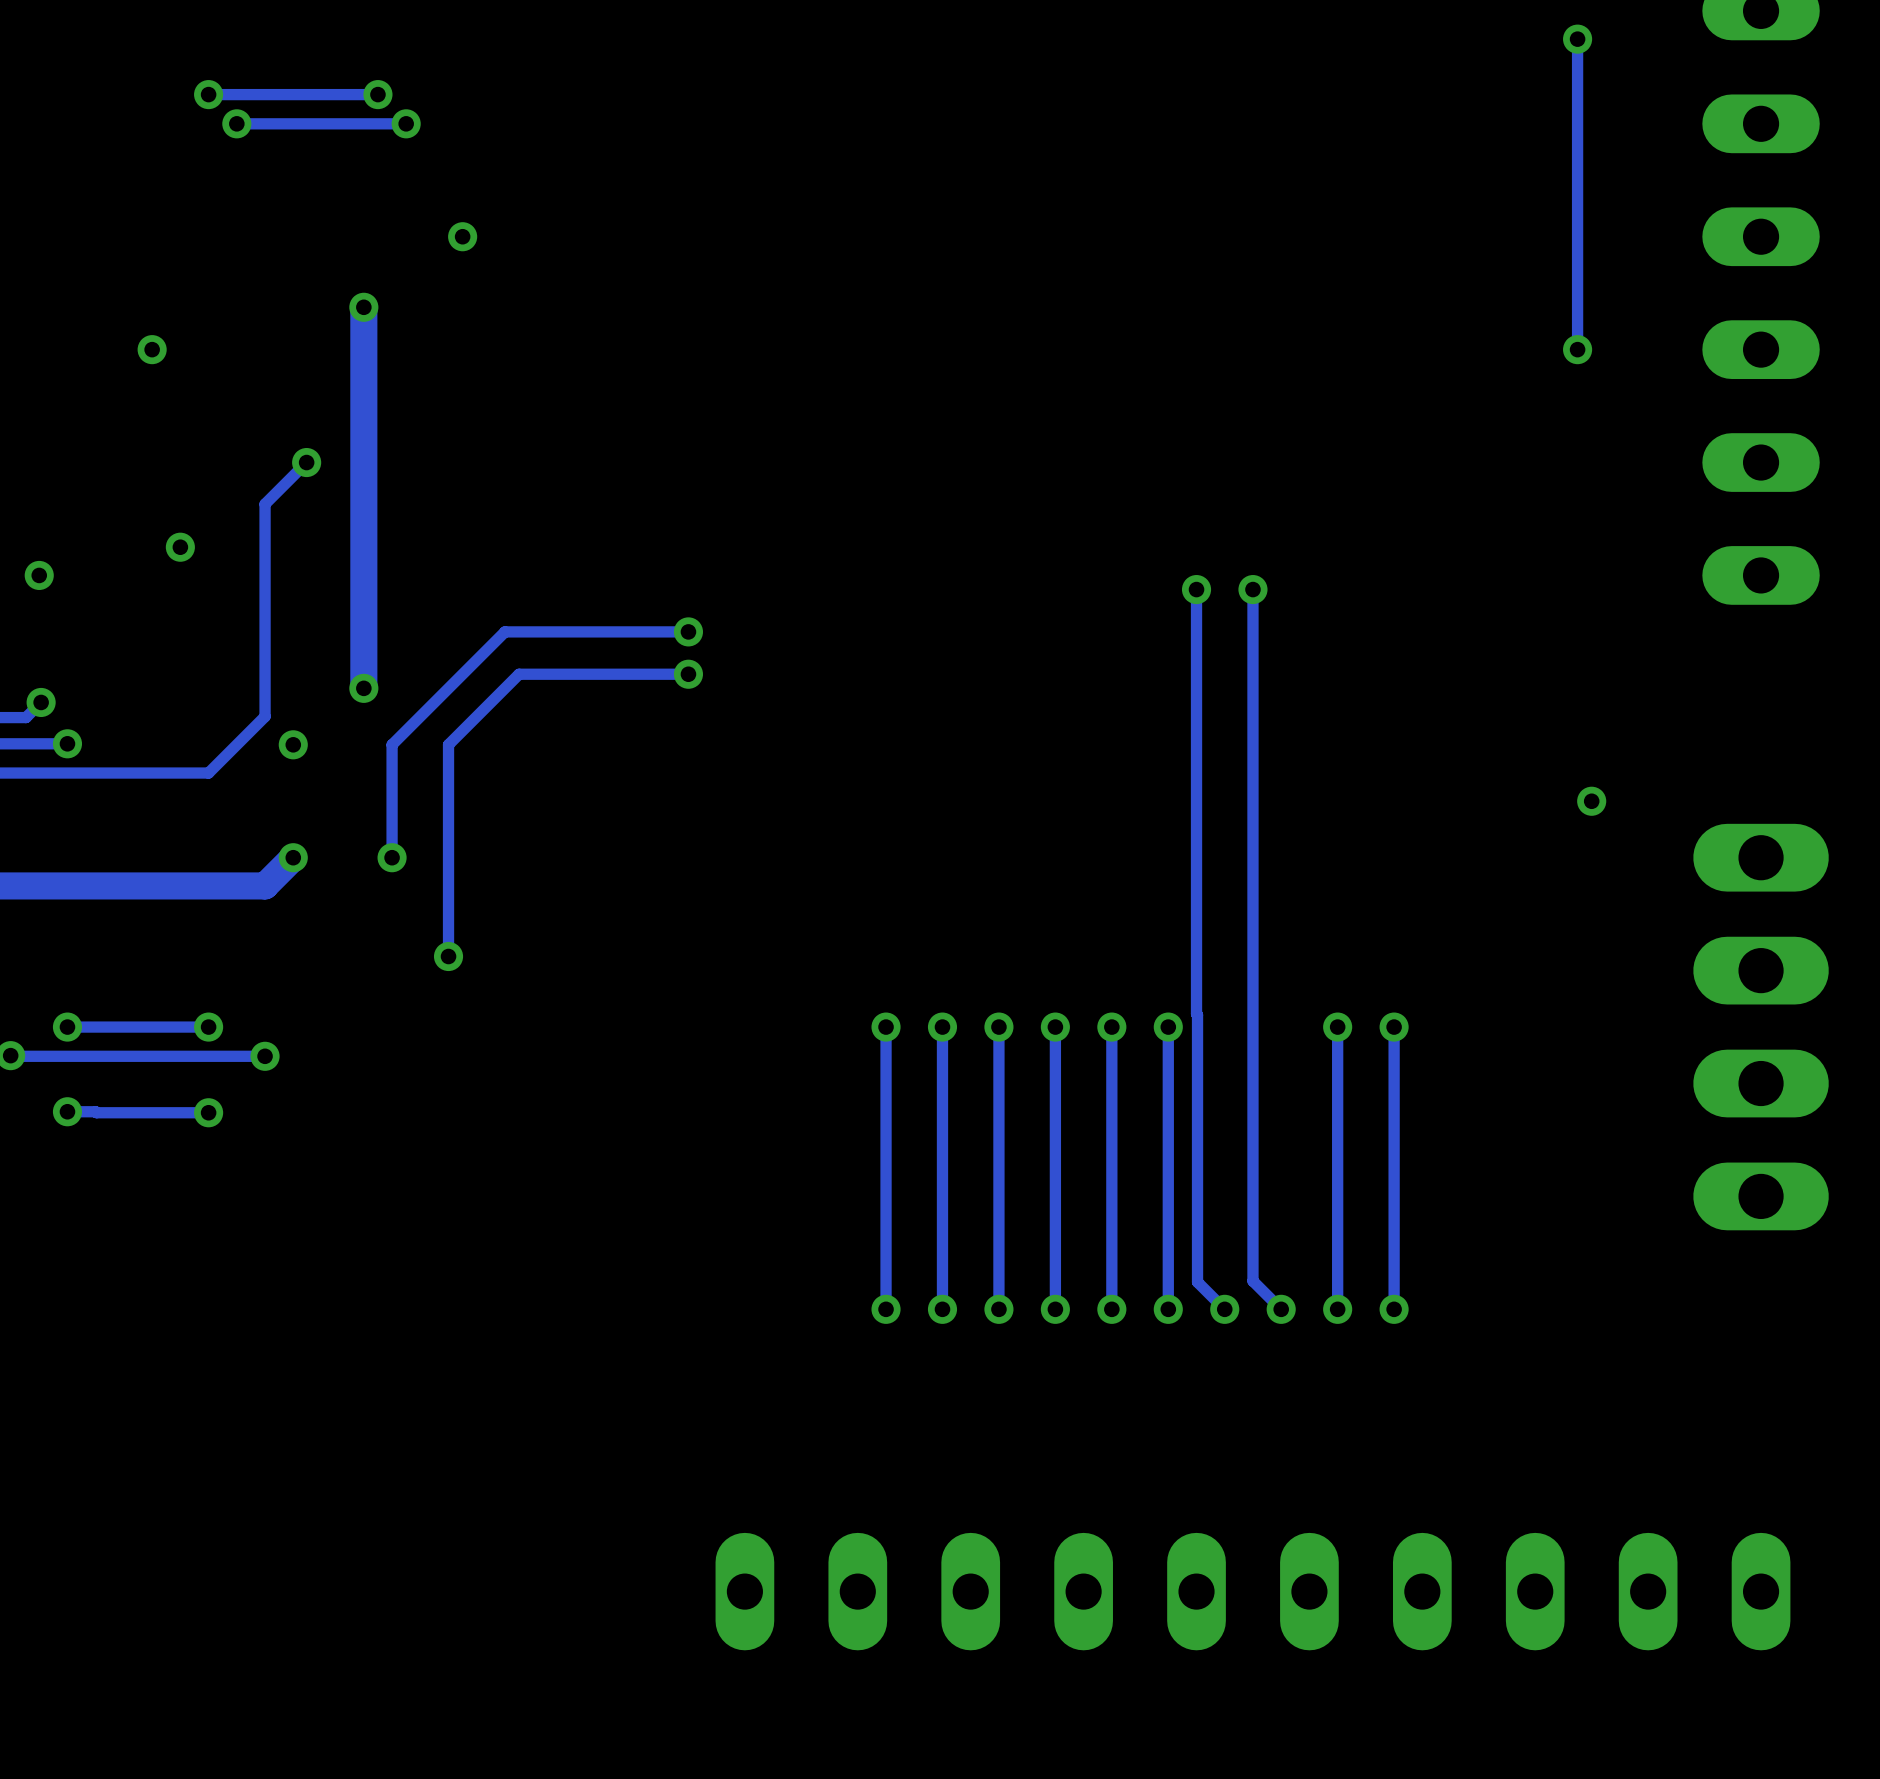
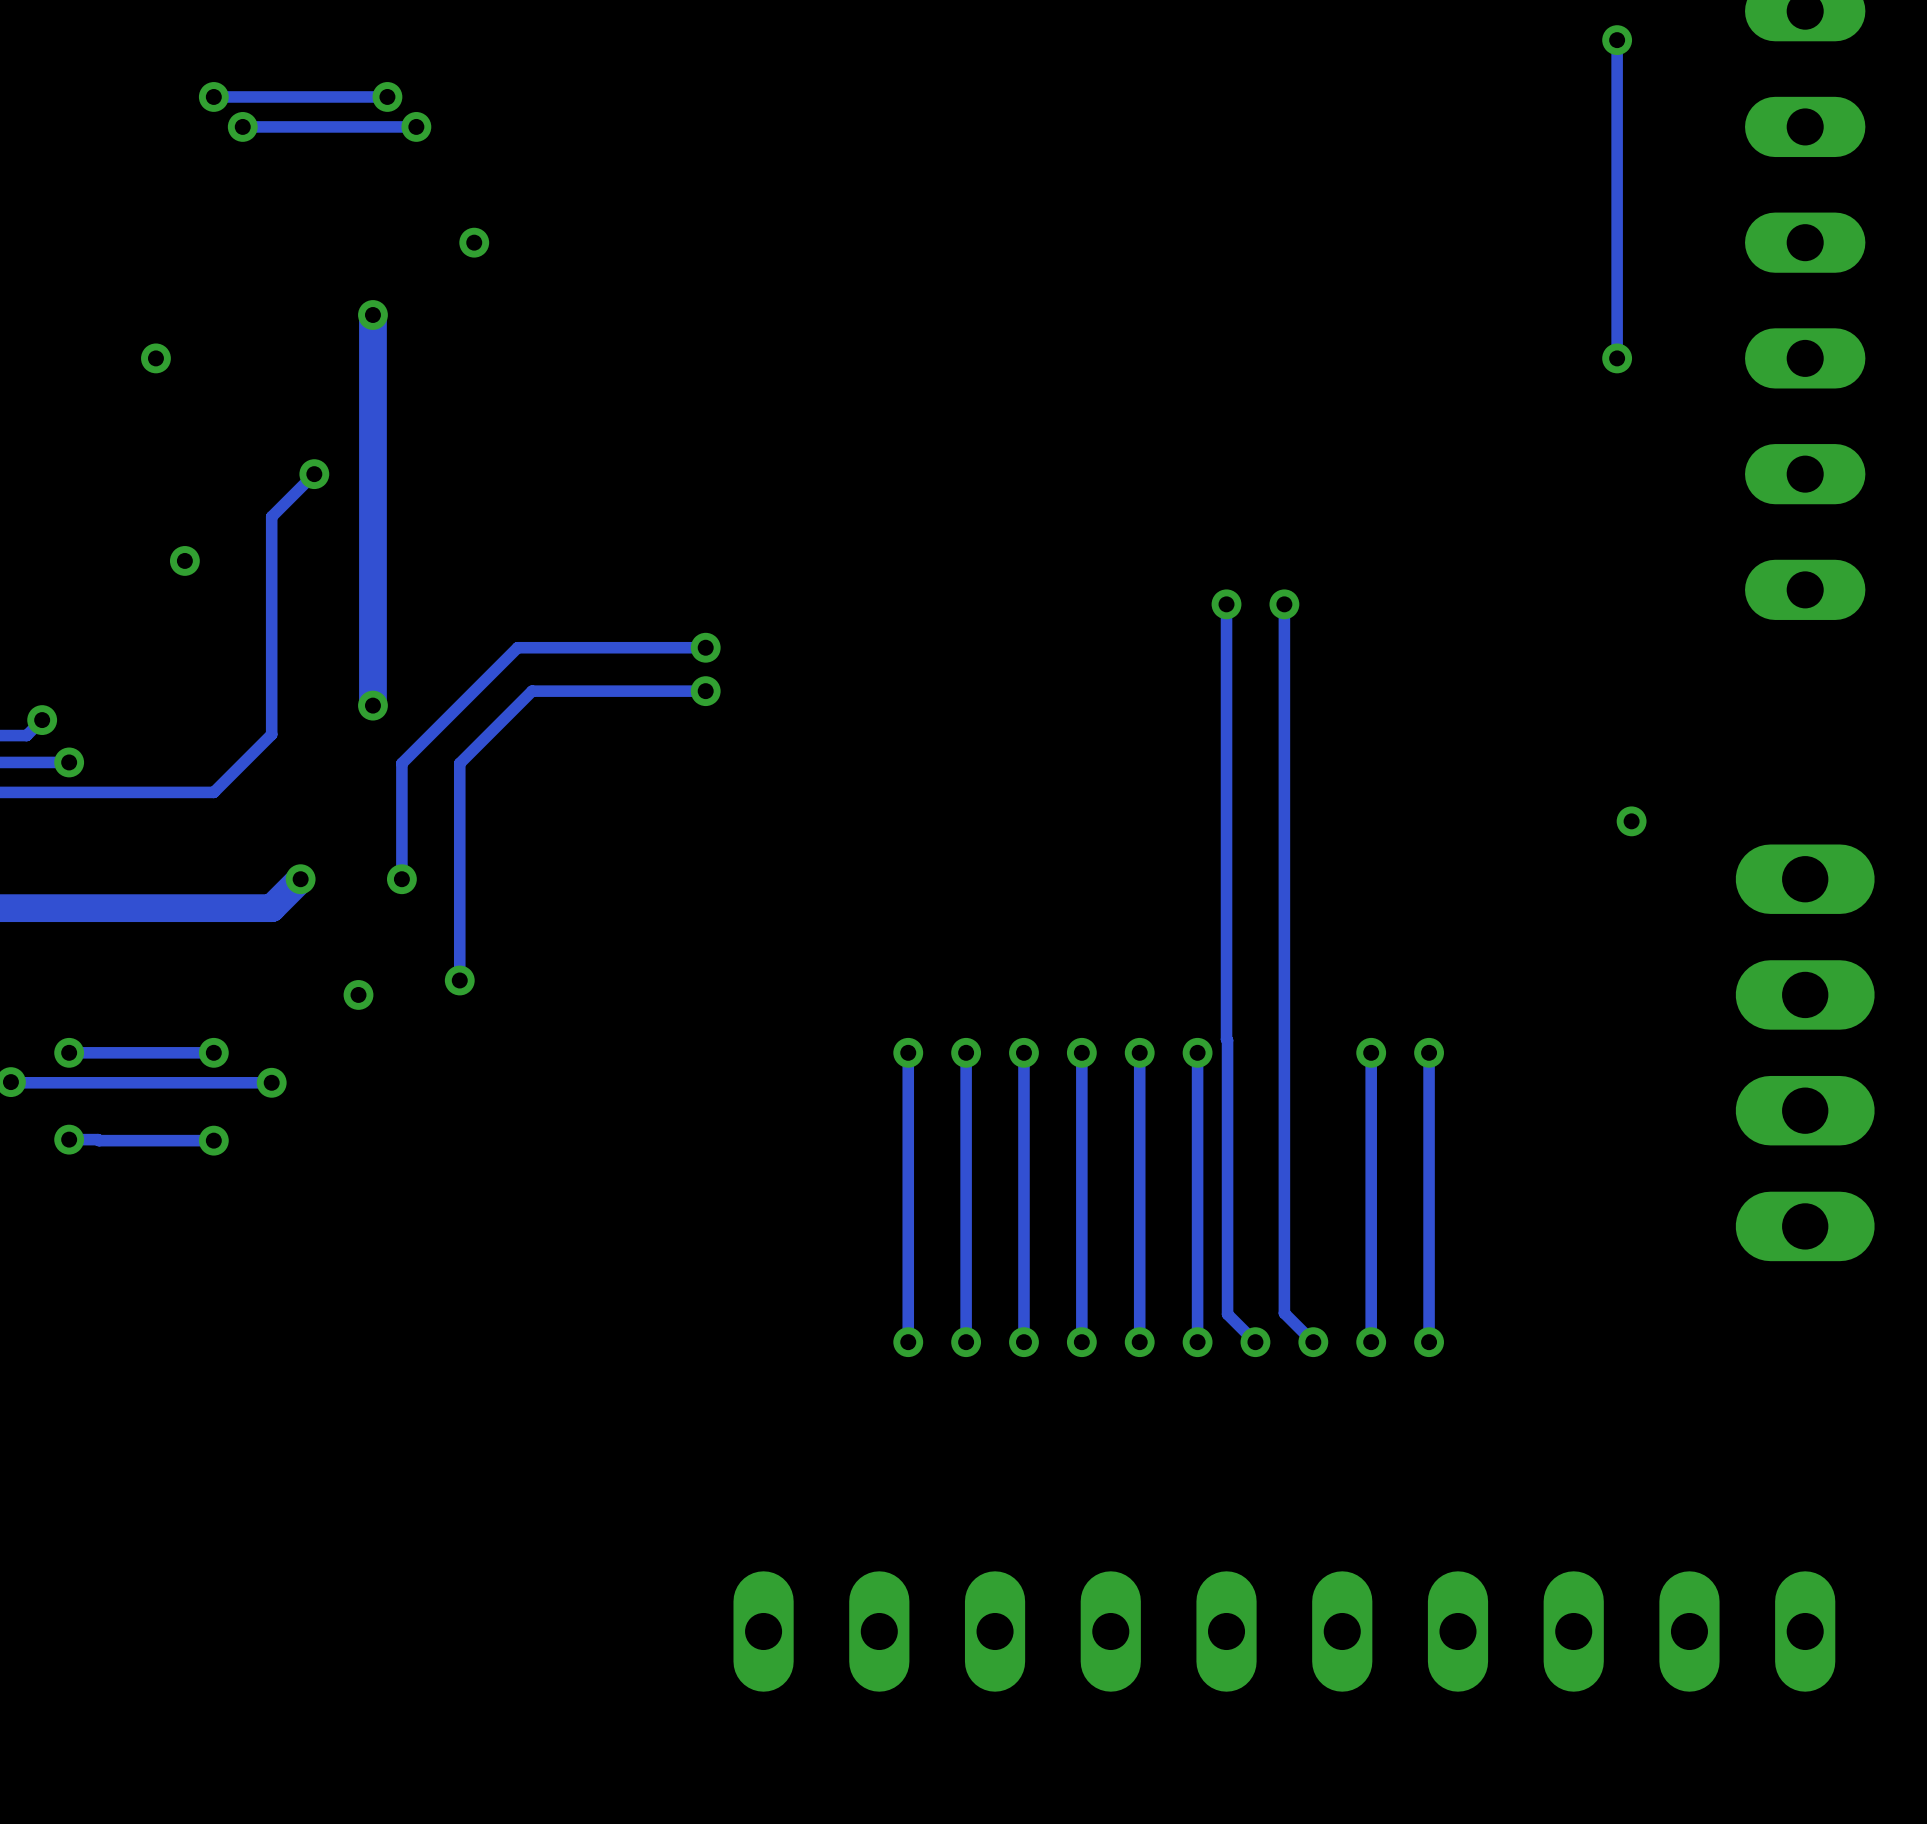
via: (39, 575) -> none
via position: (293, 744) -> (358, 994)

